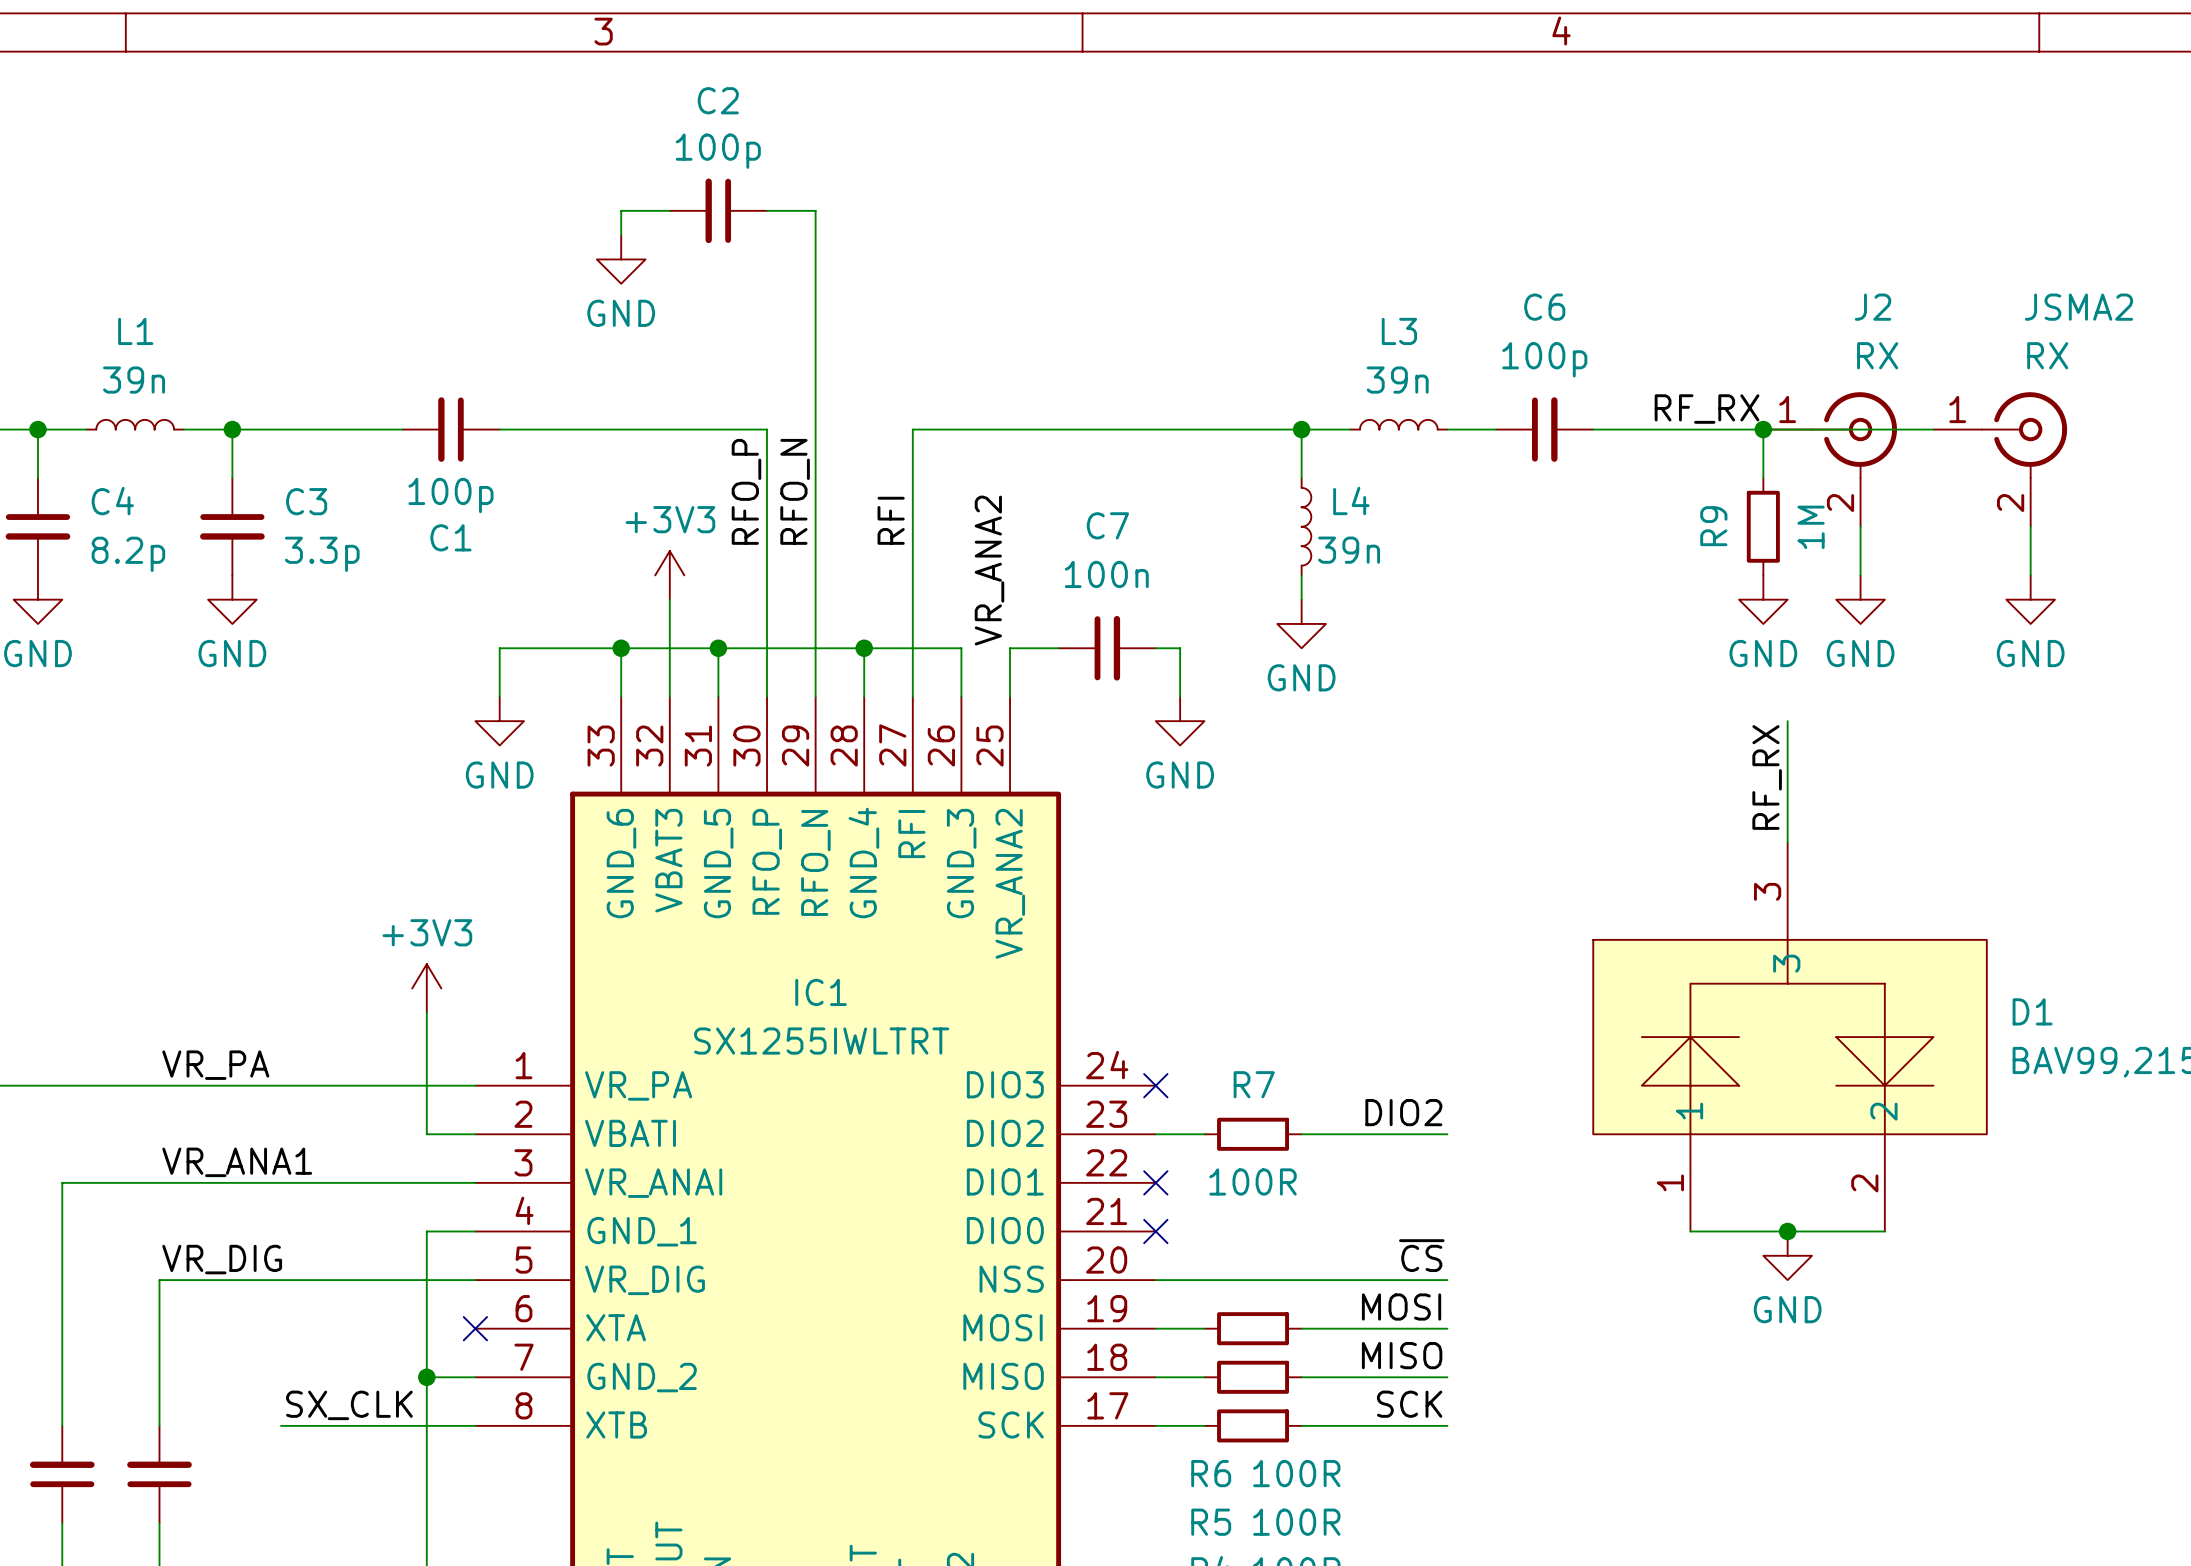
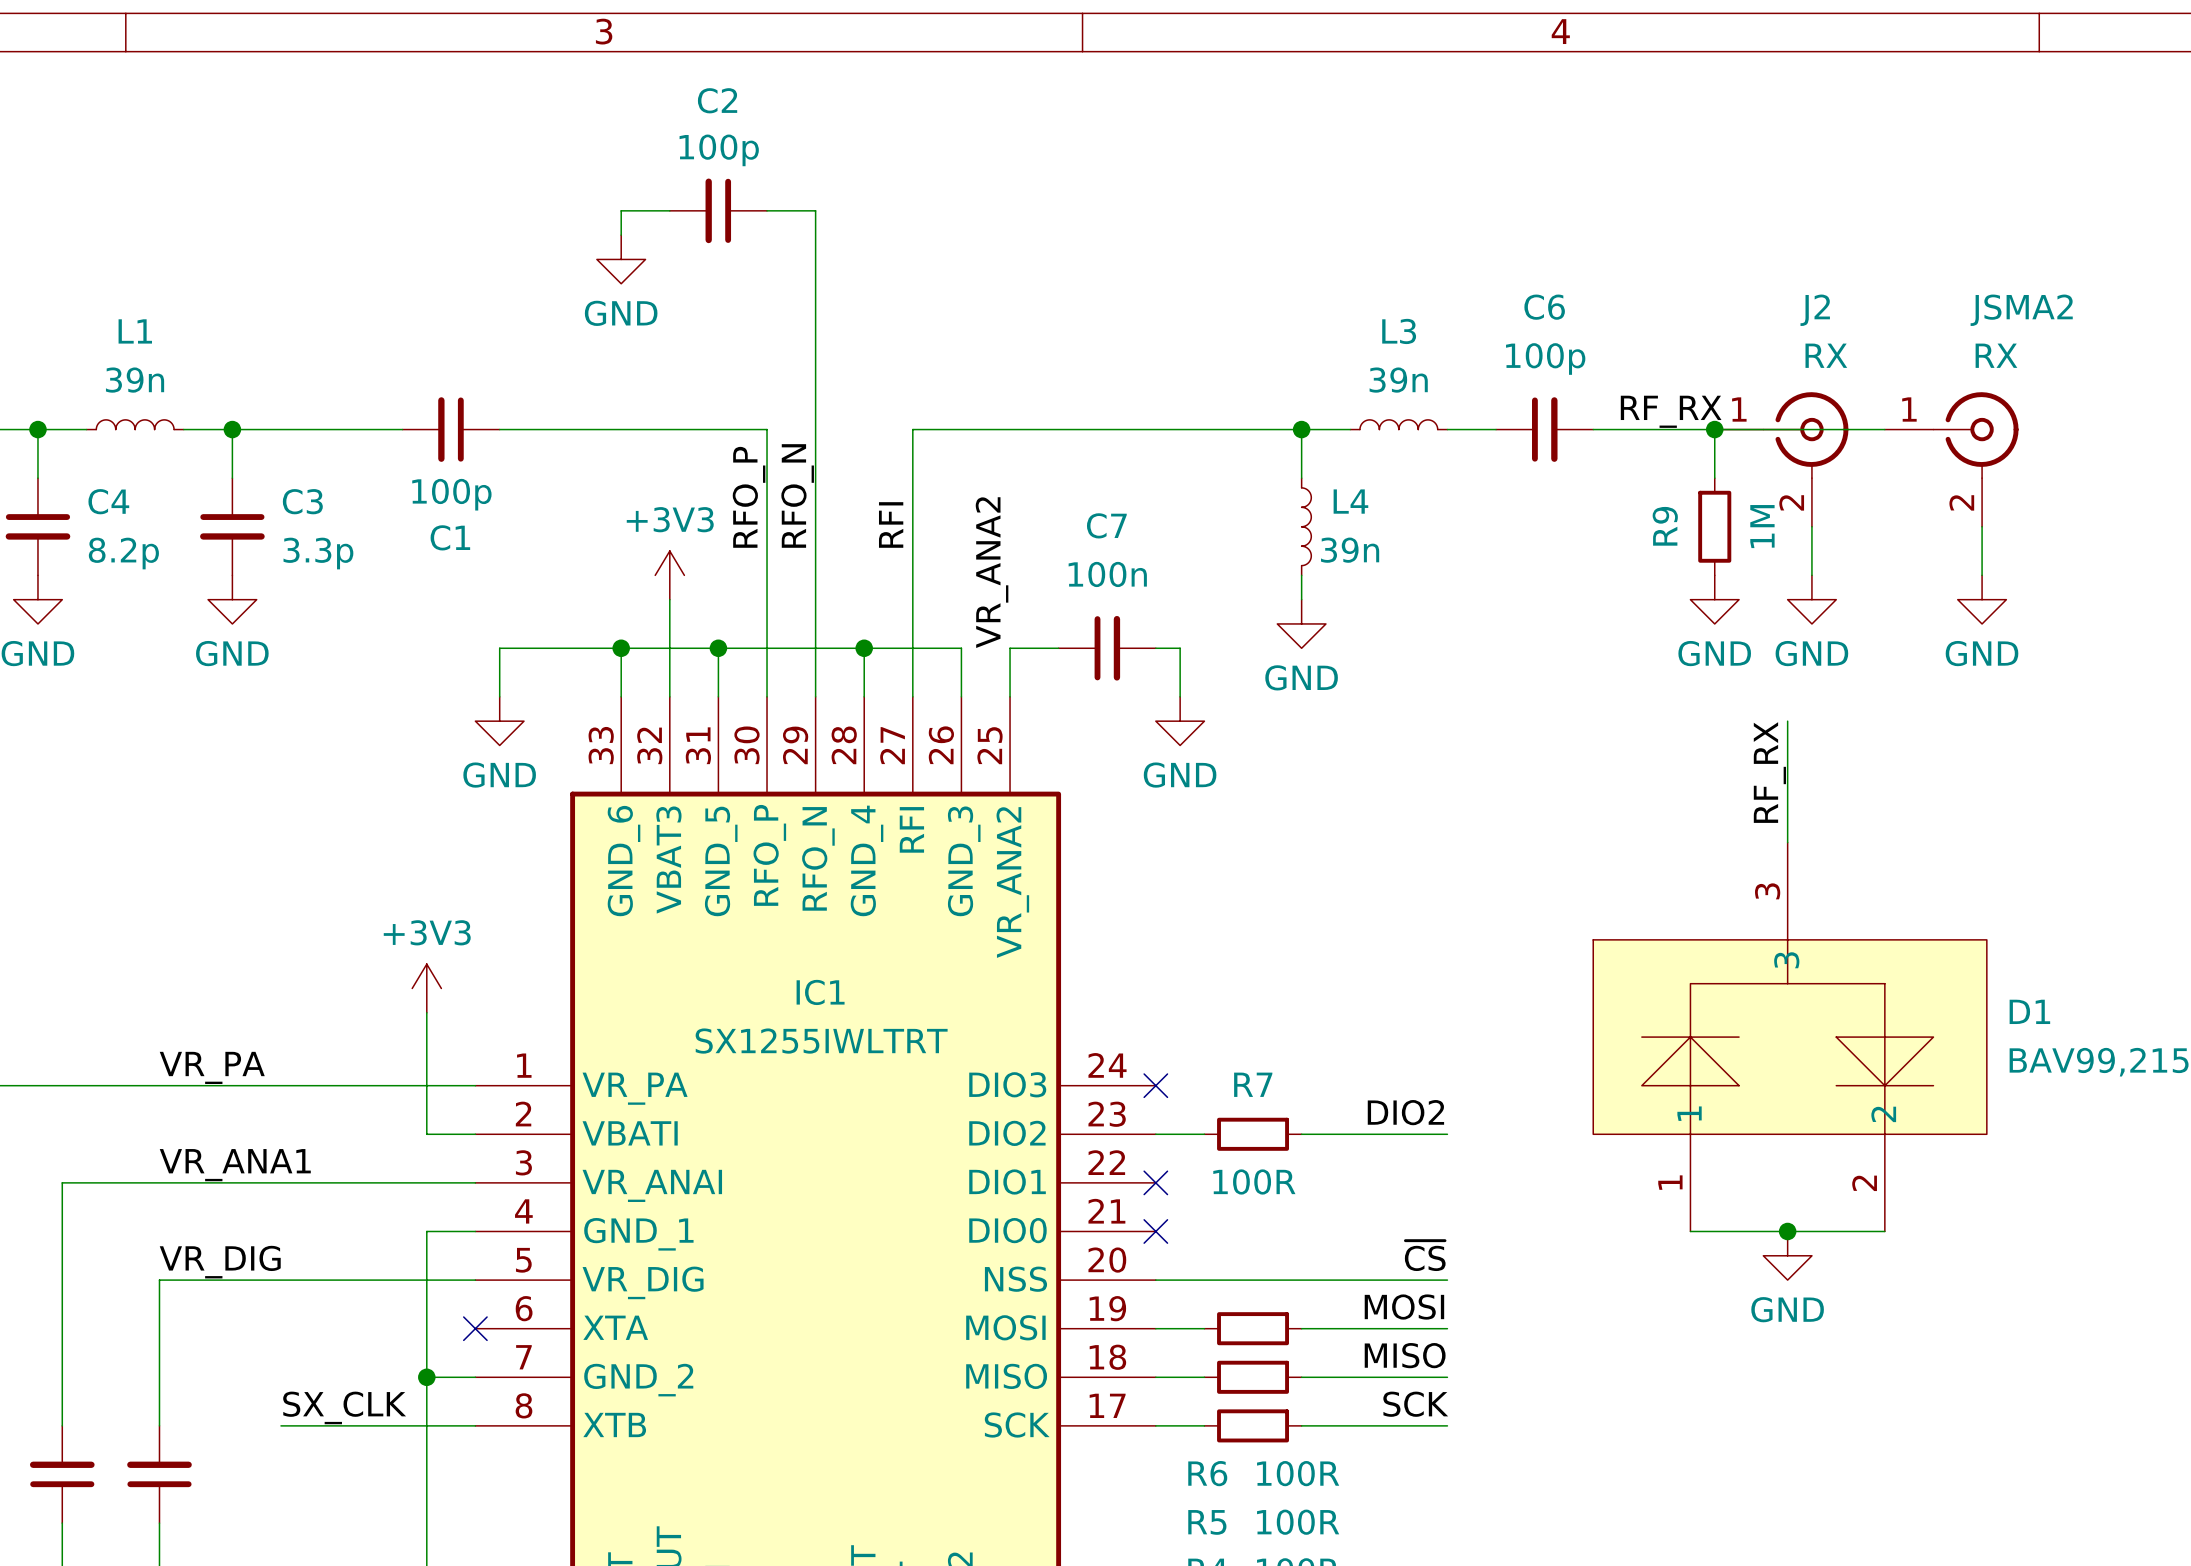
label position: RF_RX (1707, 409) -> RF_RX (1671, 411)
wire: (1763, 429) (1763, 478) -> (1714, 429) (1714, 478)
junction position: (1763, 429) -> (1714, 429)
J2 position: (1830, 459) -> (1781, 459)
JSMA2 position: (2000, 459) -> (1951, 459)
R9 position: (1763, 526) -> (1714, 526)
wire: (1860, 526) (1860, 575) -> (1811, 526) (1811, 575)
wire: (2030, 526) (2030, 575) -> (1982, 526) (1982, 575)
power symbol: none -> GND (1714, 599)
power symbol: GND (1763, 599) -> none
power symbol: none -> GND (1811, 599)
power symbol: GND (1860, 599) -> none
power symbol position: GND (2030, 599) -> GND (1982, 599)

